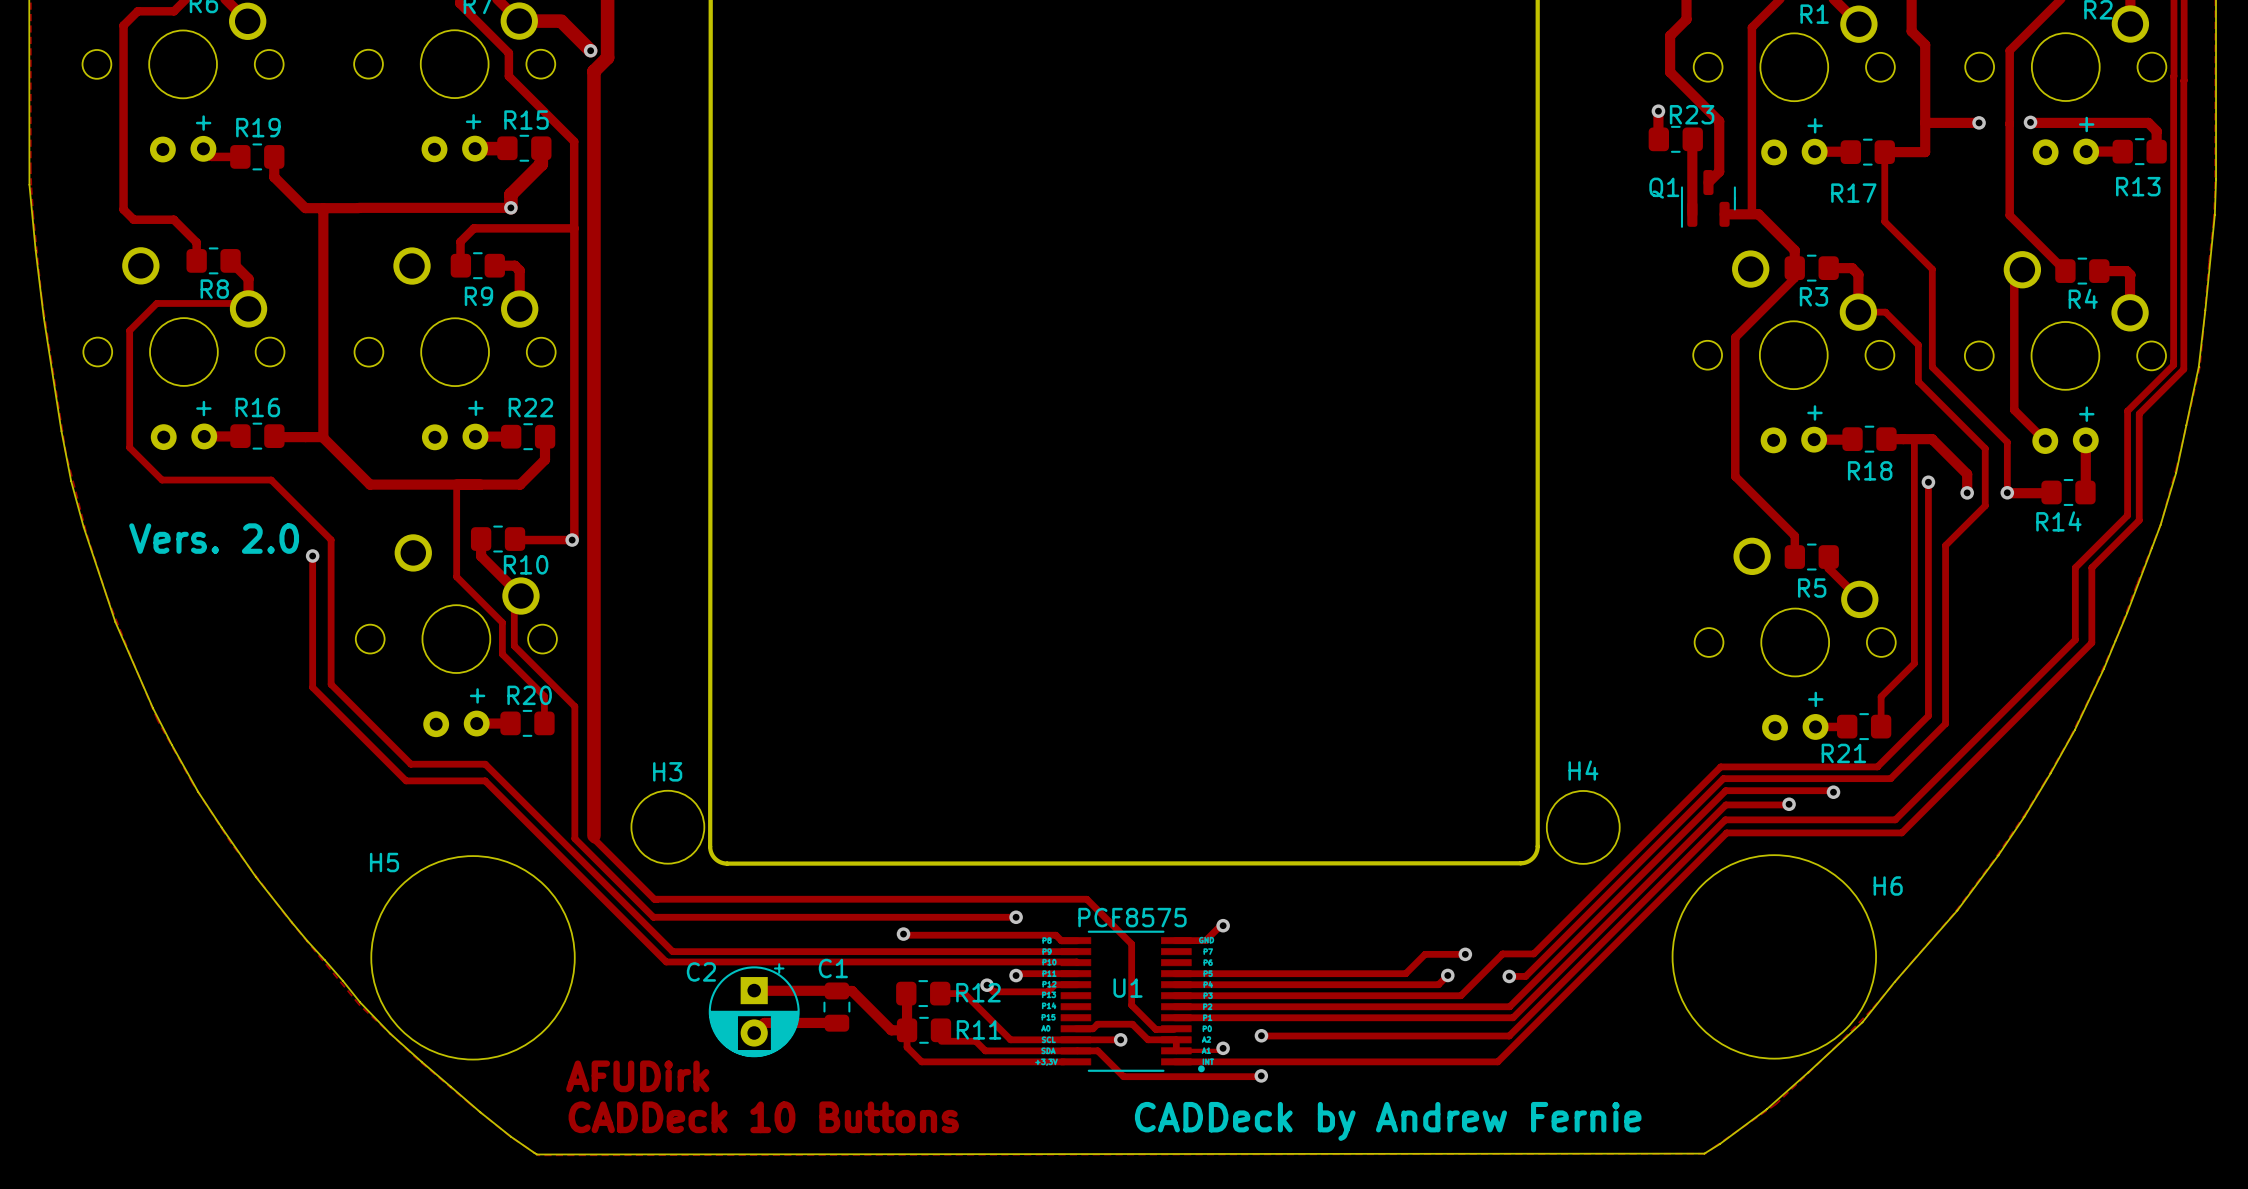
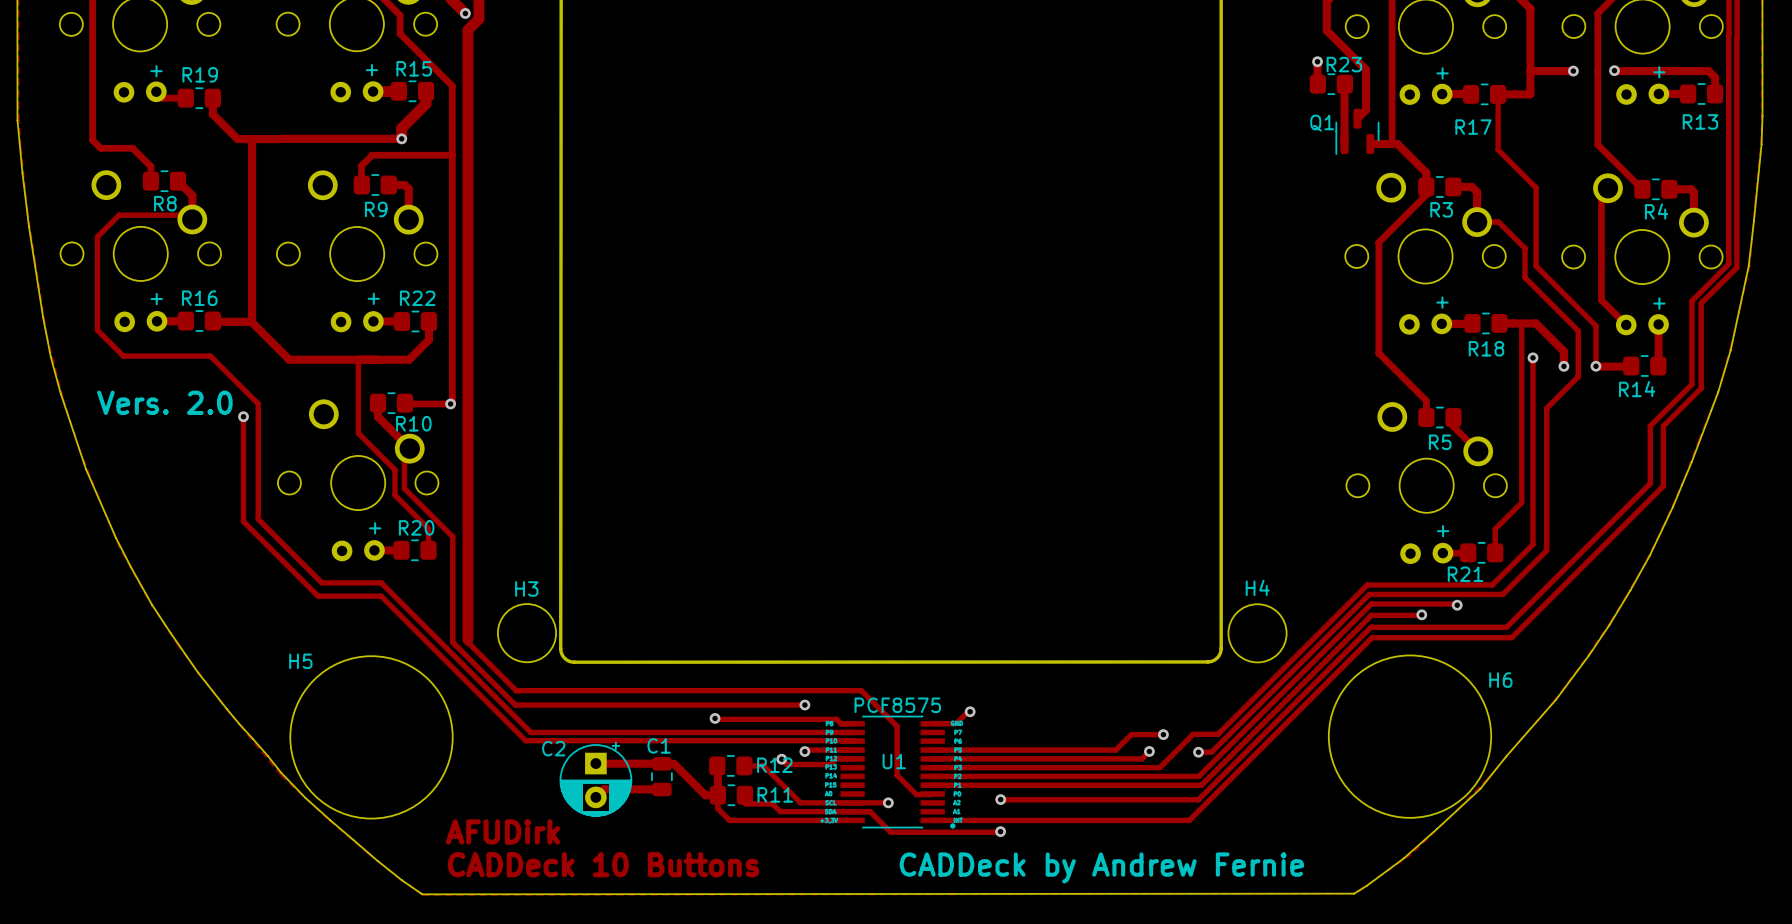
track: (1075, 1028) (1093, 1028) (1097, 1024) (1132, 1024) (1148, 1039) (1176, 1039) (1176, 1050) (1223, 1050) -> none
via: (1223, 1048) -> none

